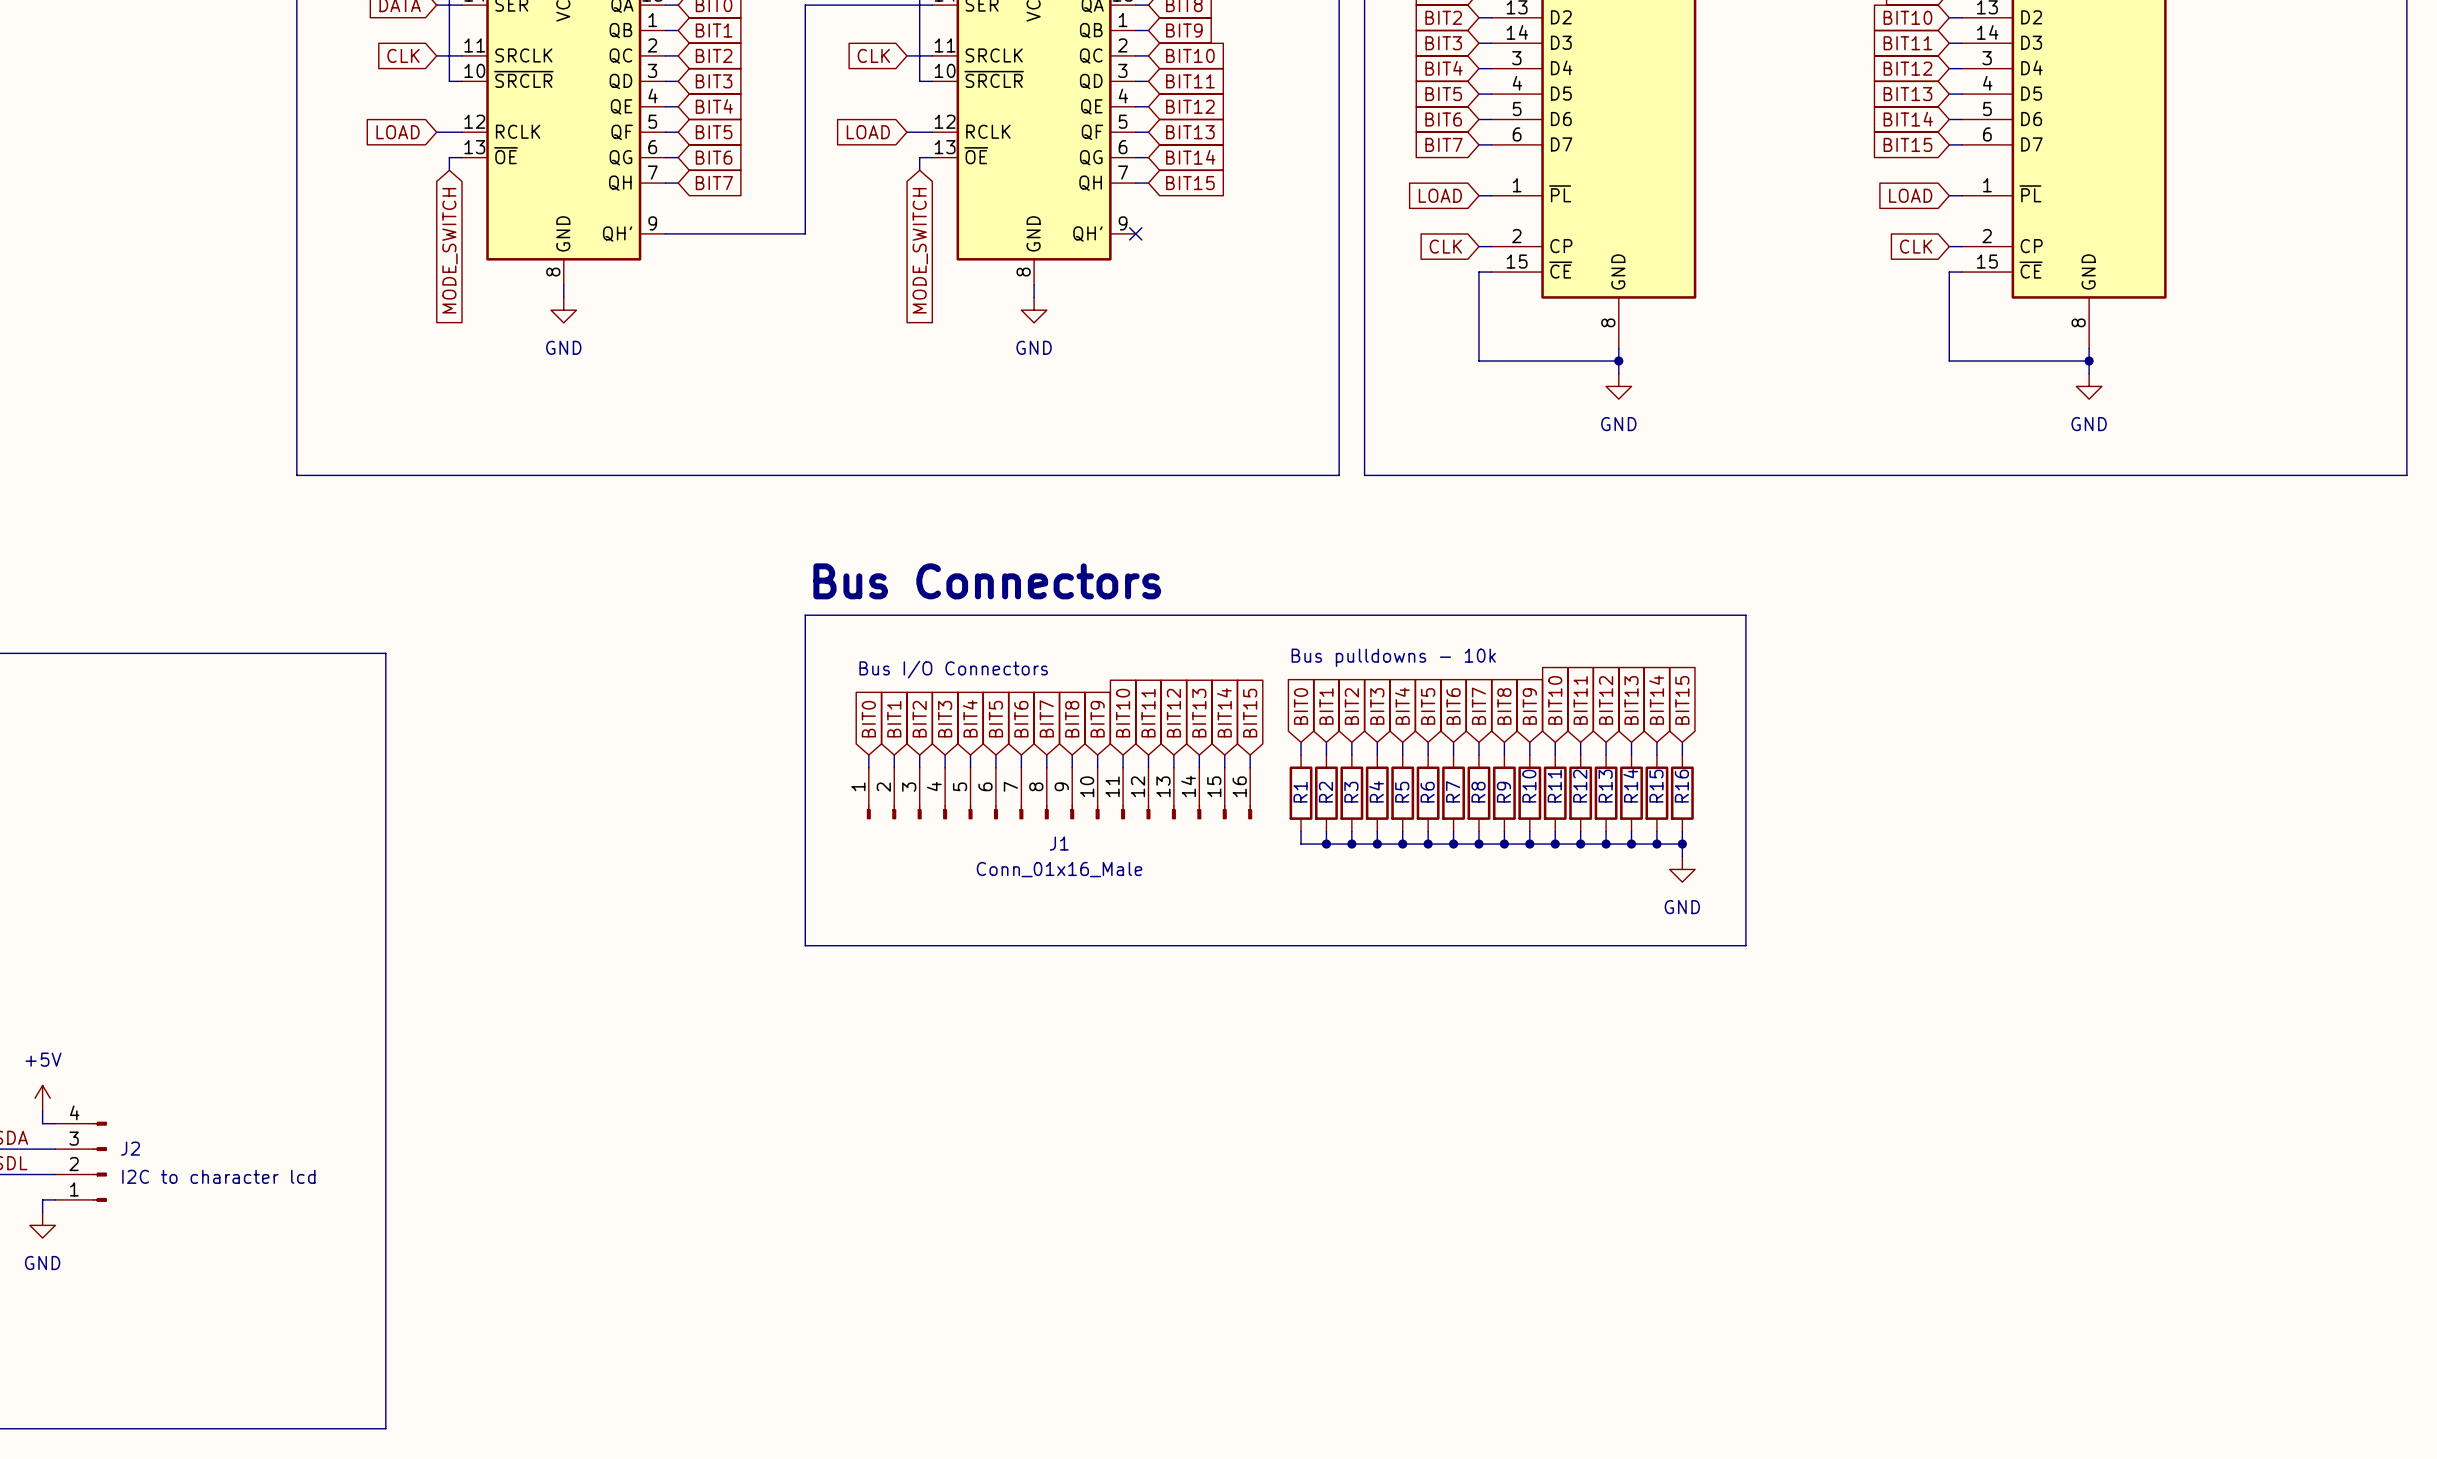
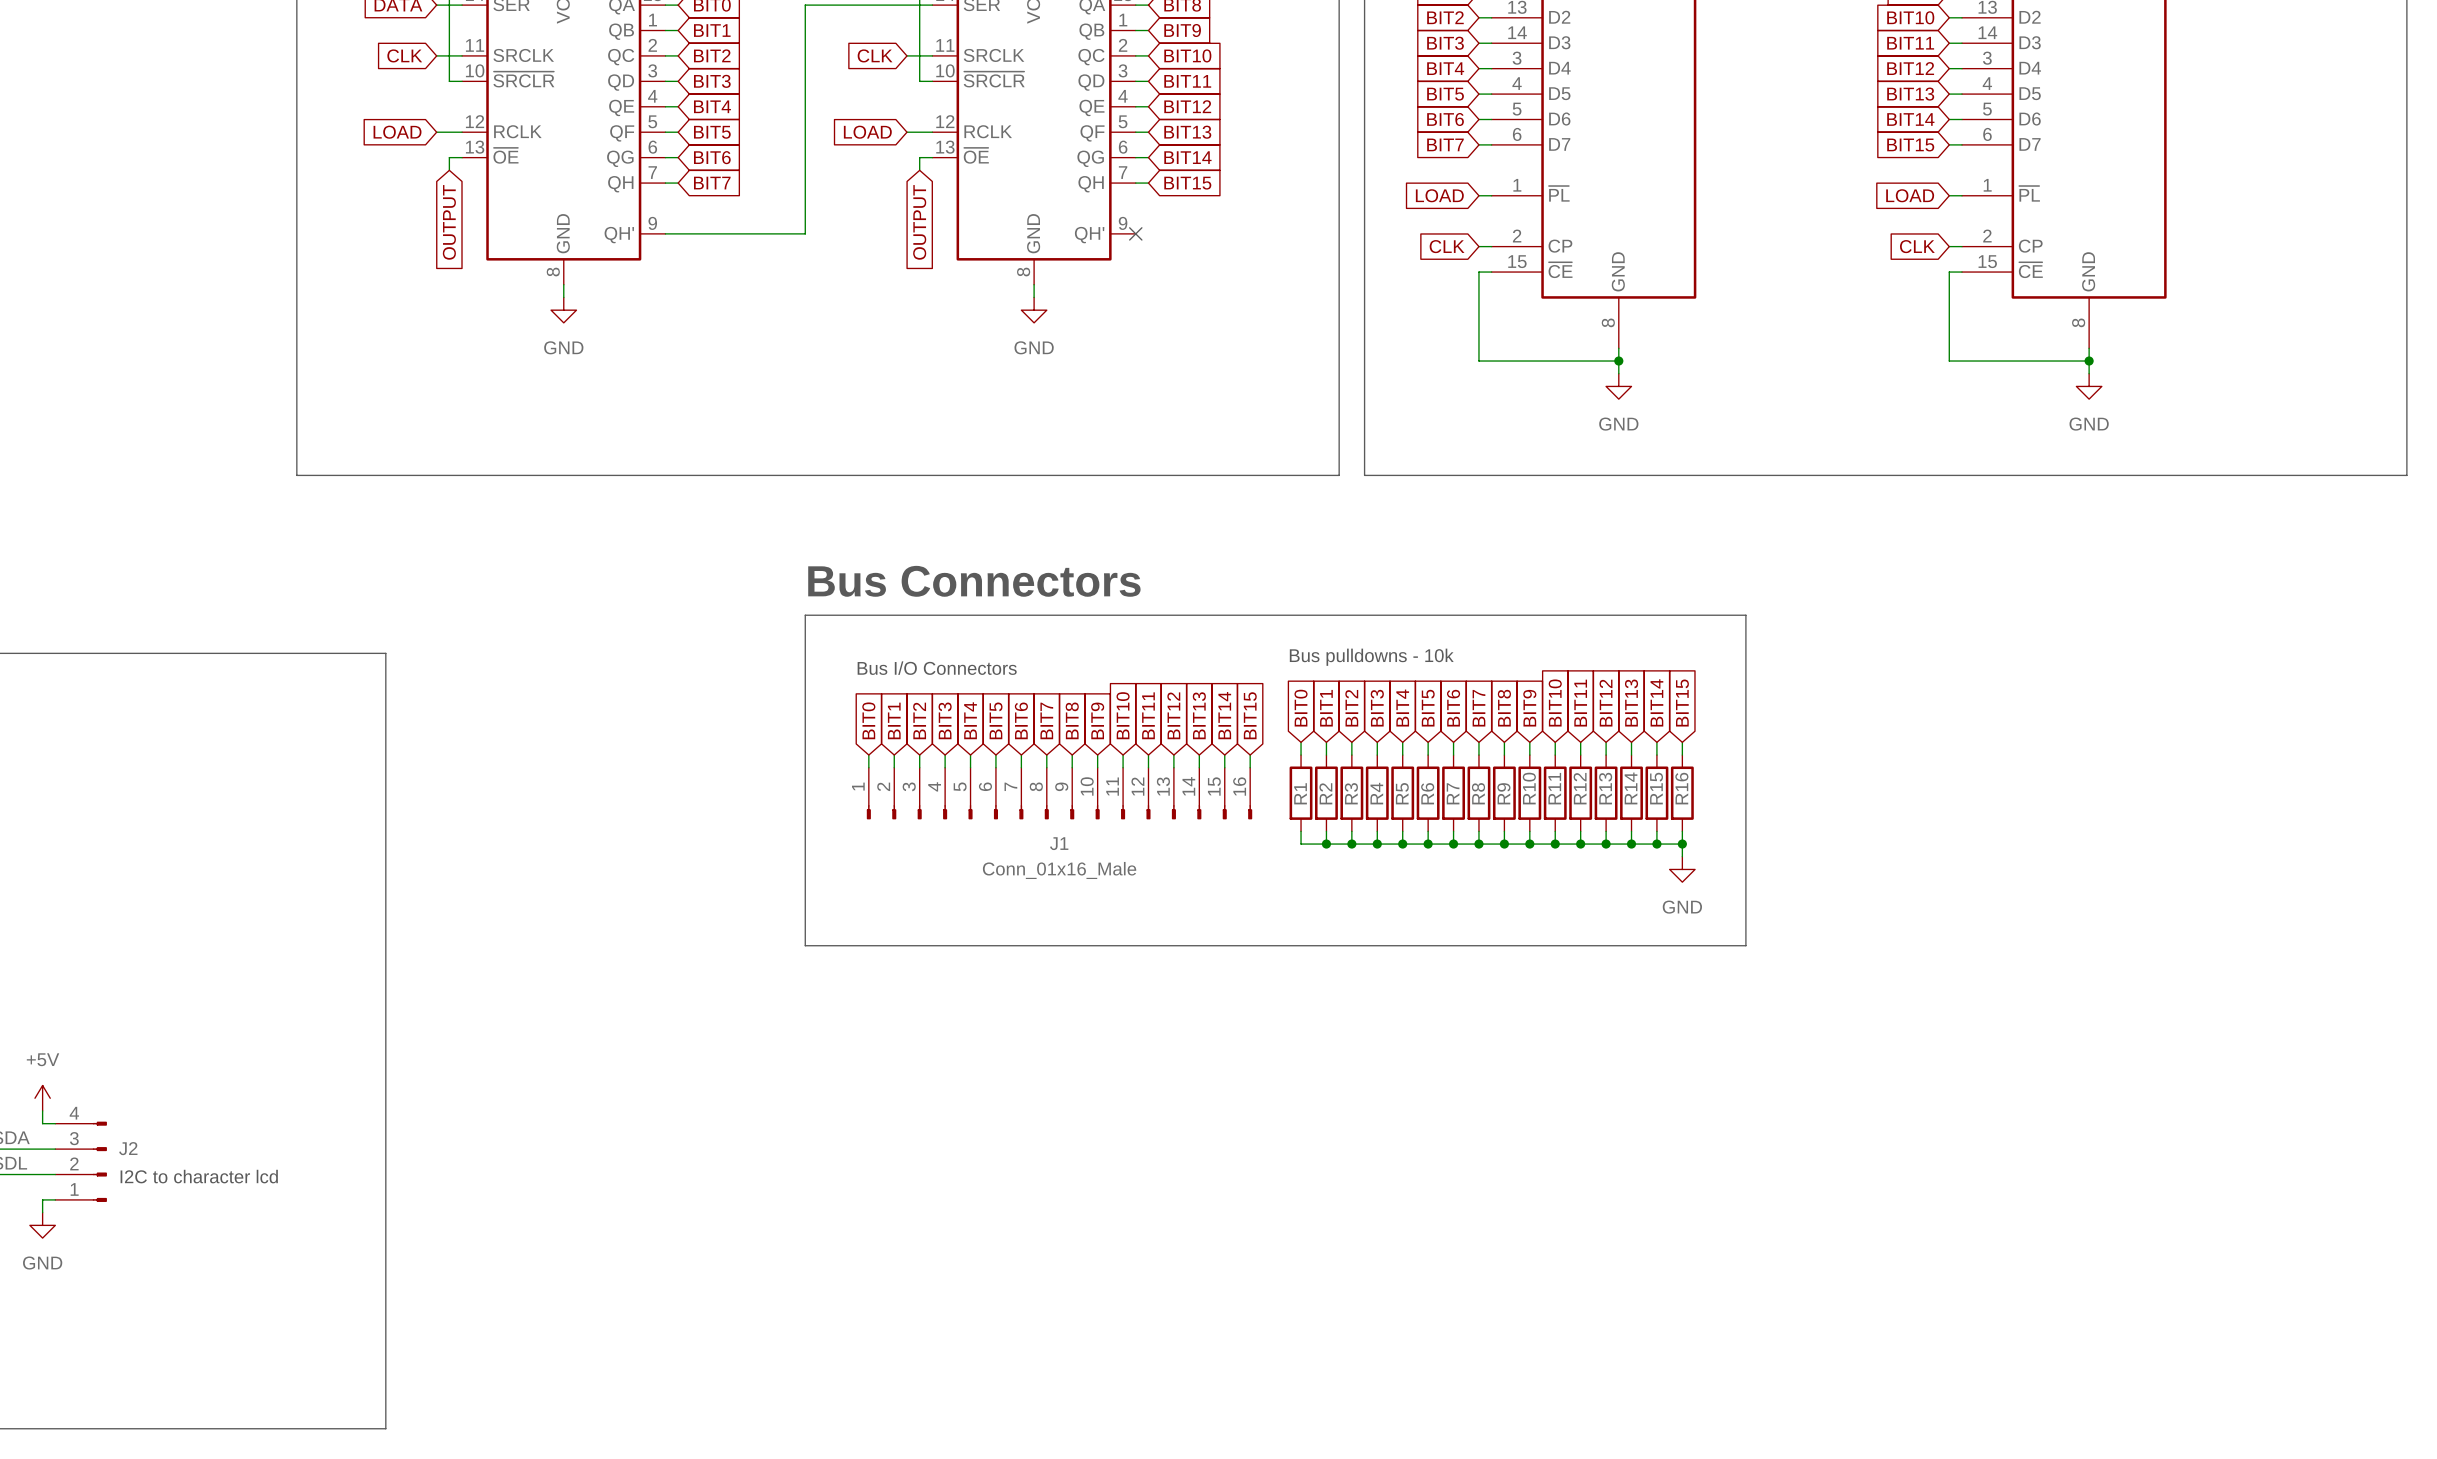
global label: MODE_SWITCH (449, 250) -> OUTPUT (449, 222)
global label: MODE_SWITCH (920, 250) -> OUTPUT (919, 222)

